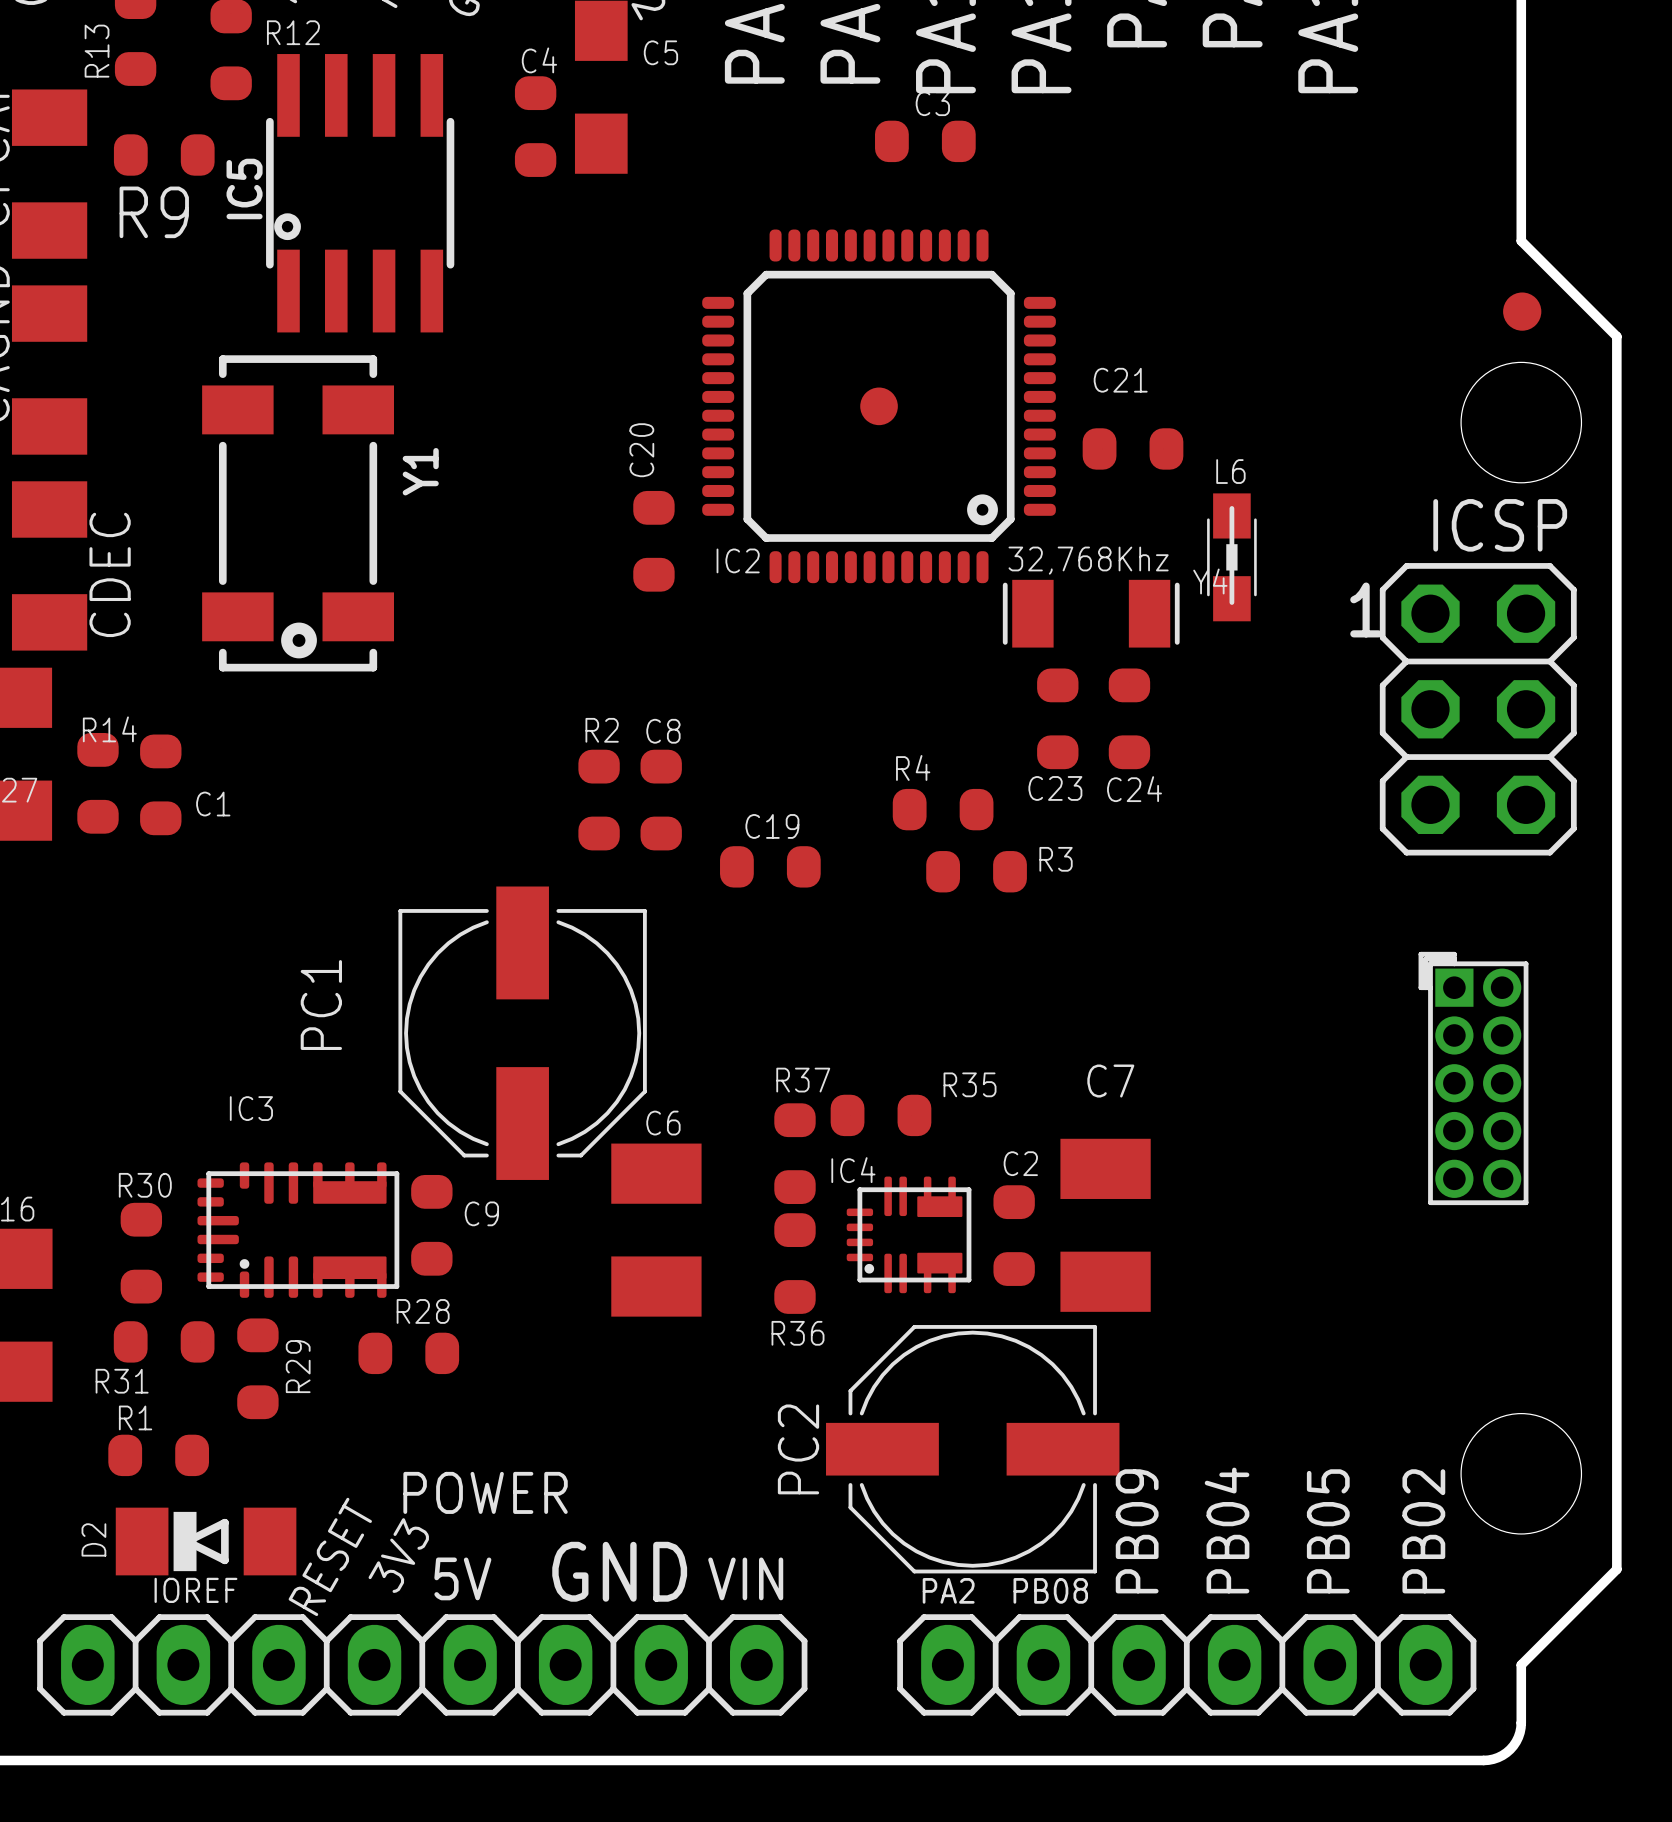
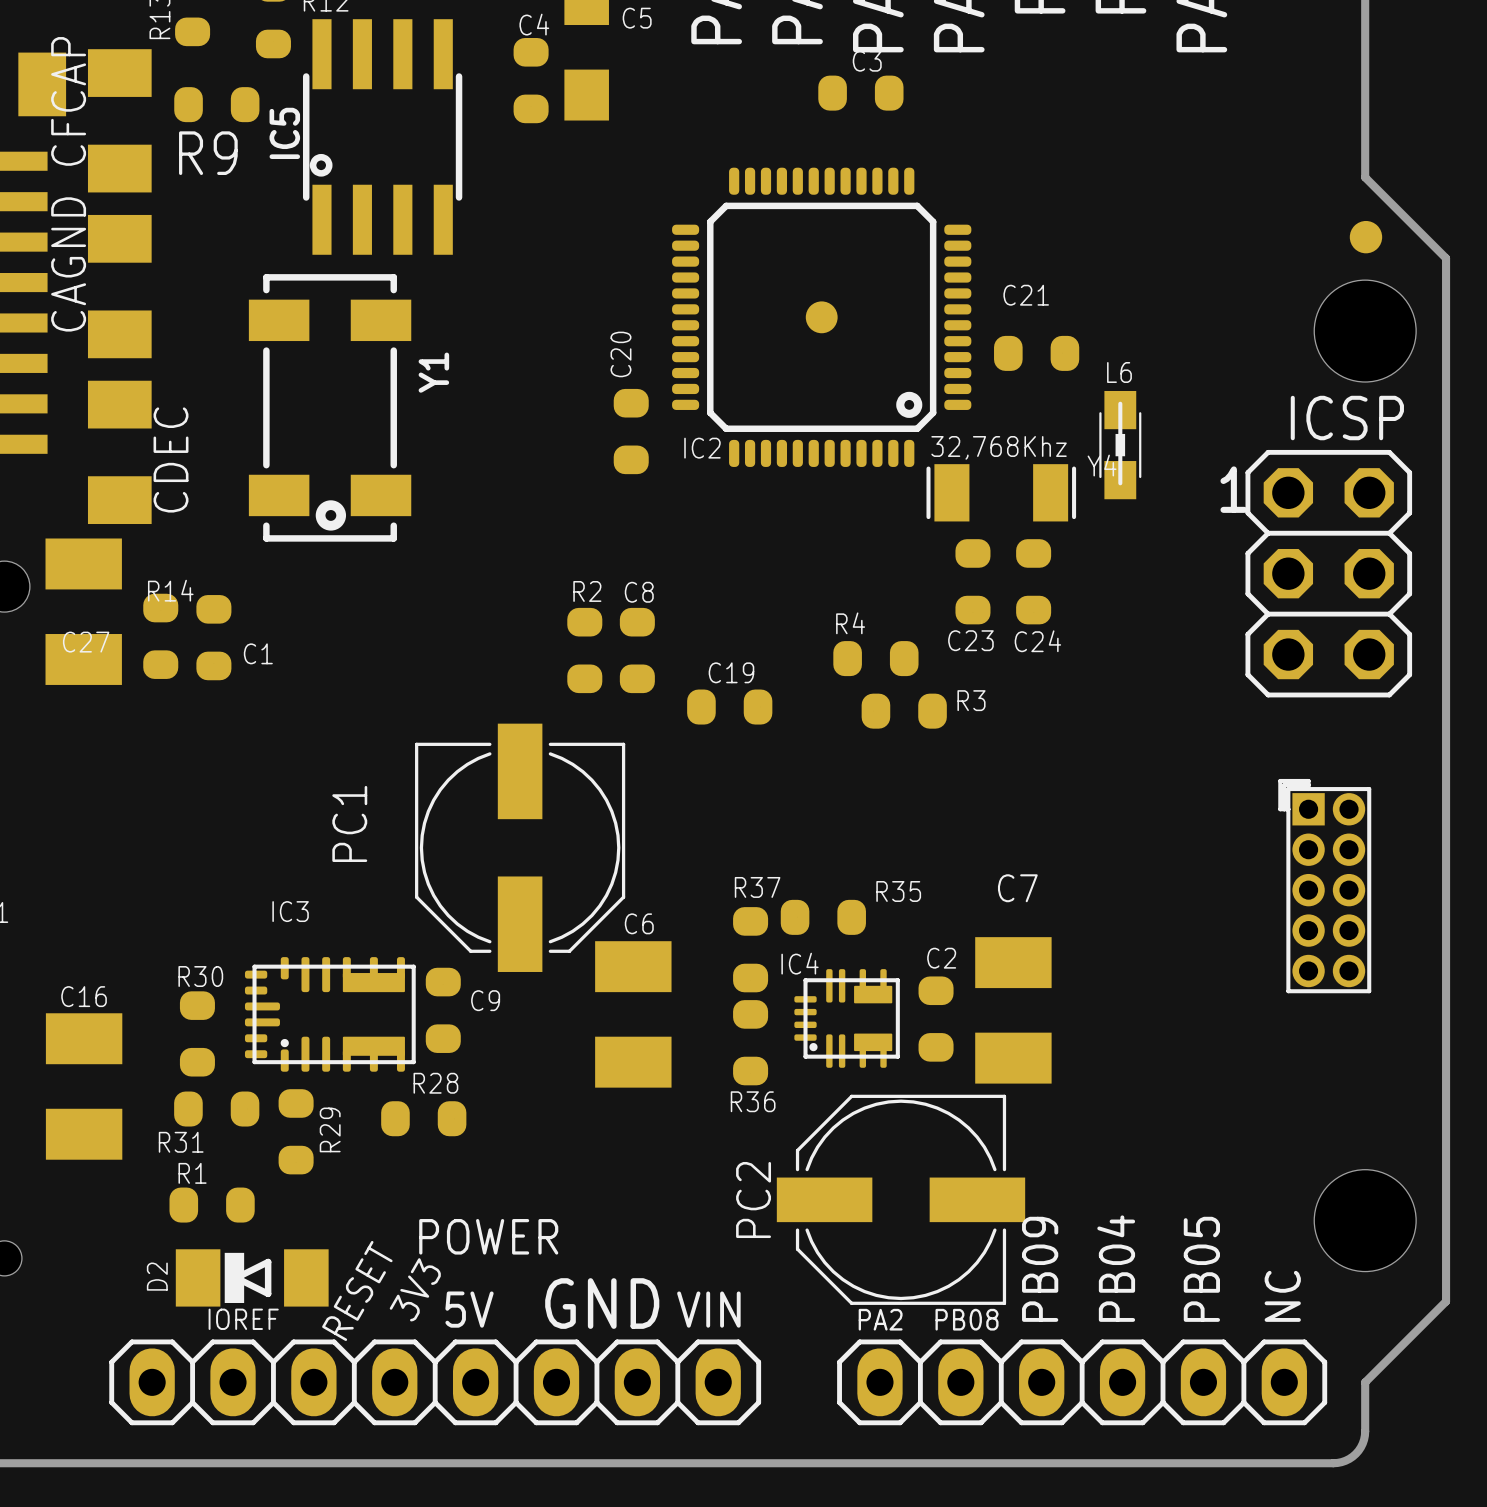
text: PB02 (1423, 1531) -> NC (1282, 1296)

